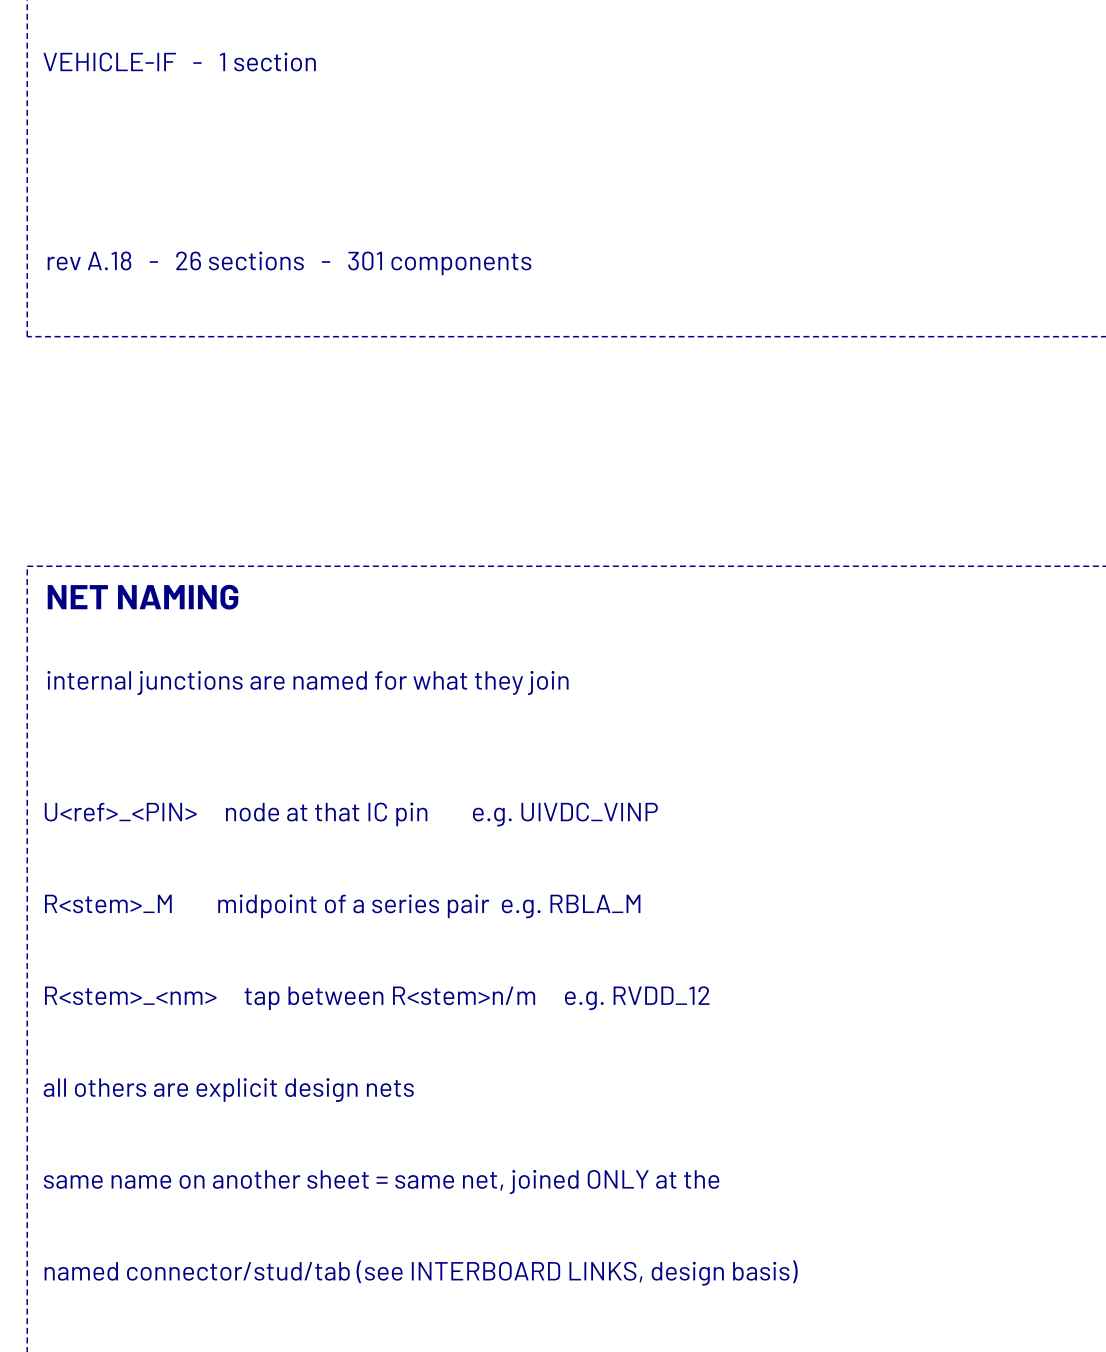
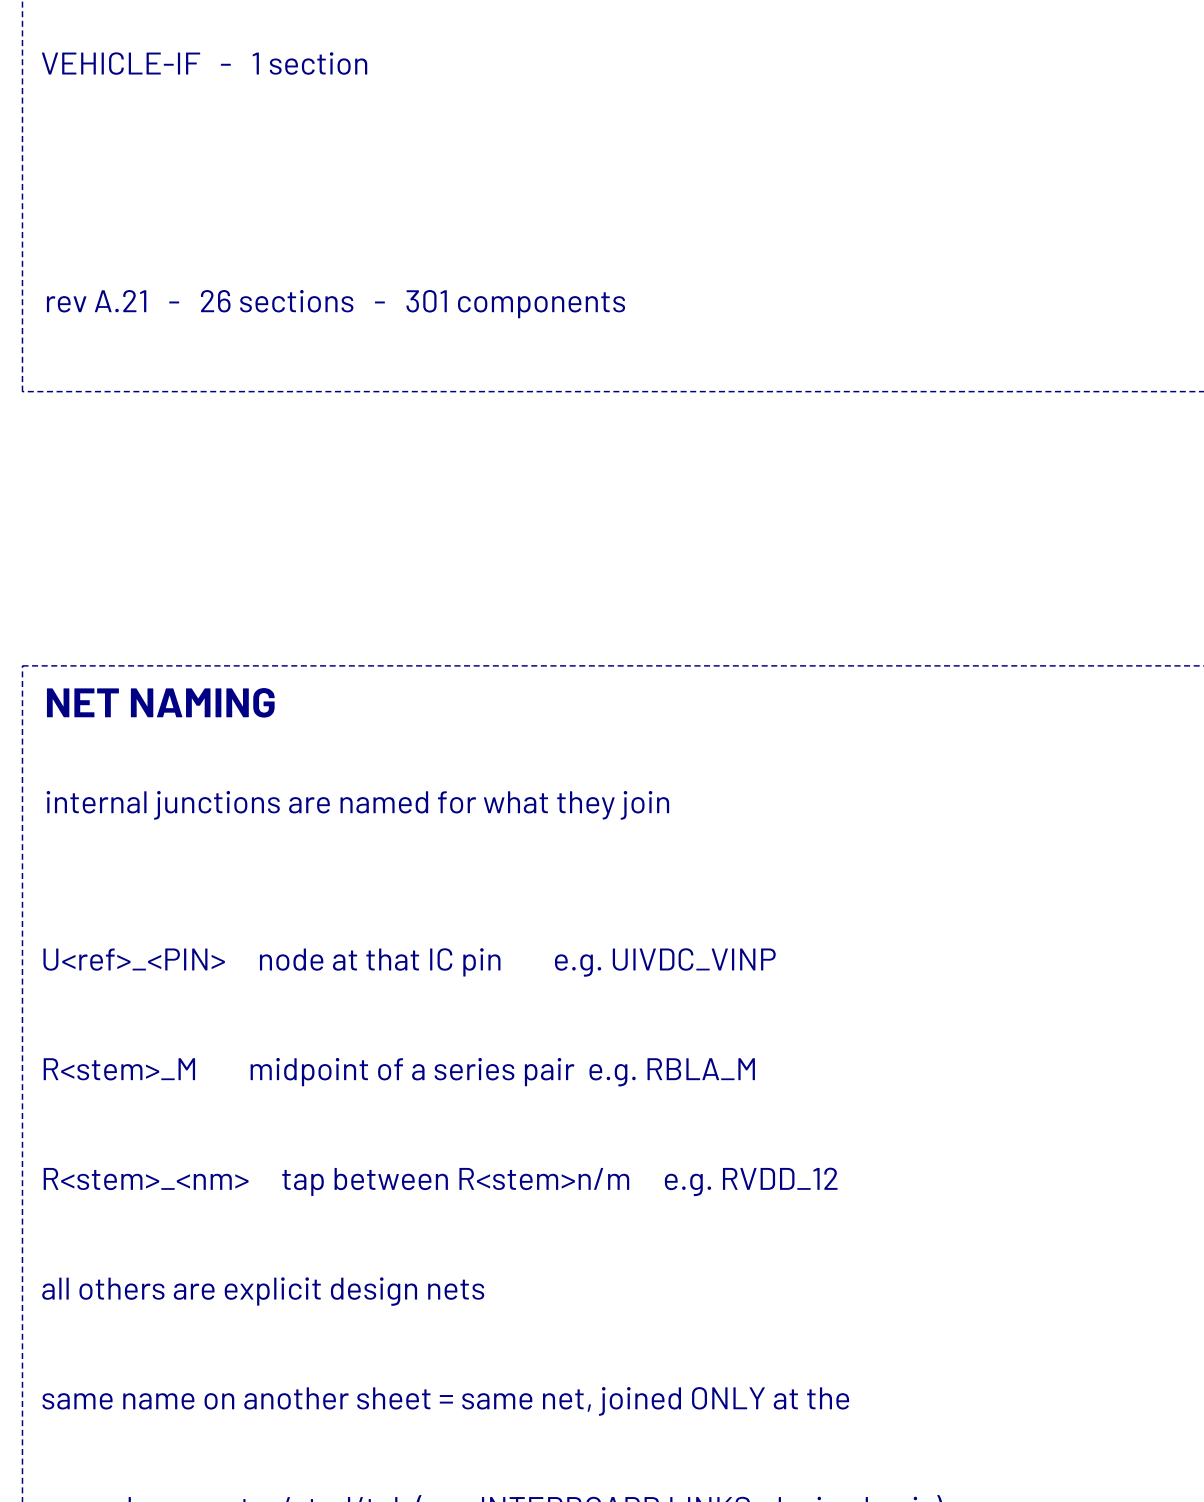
text: rev A.18 - 26 sections - 301 components (289, 263) -> rev A.21 - 26 sections - 301 components (336, 304)

